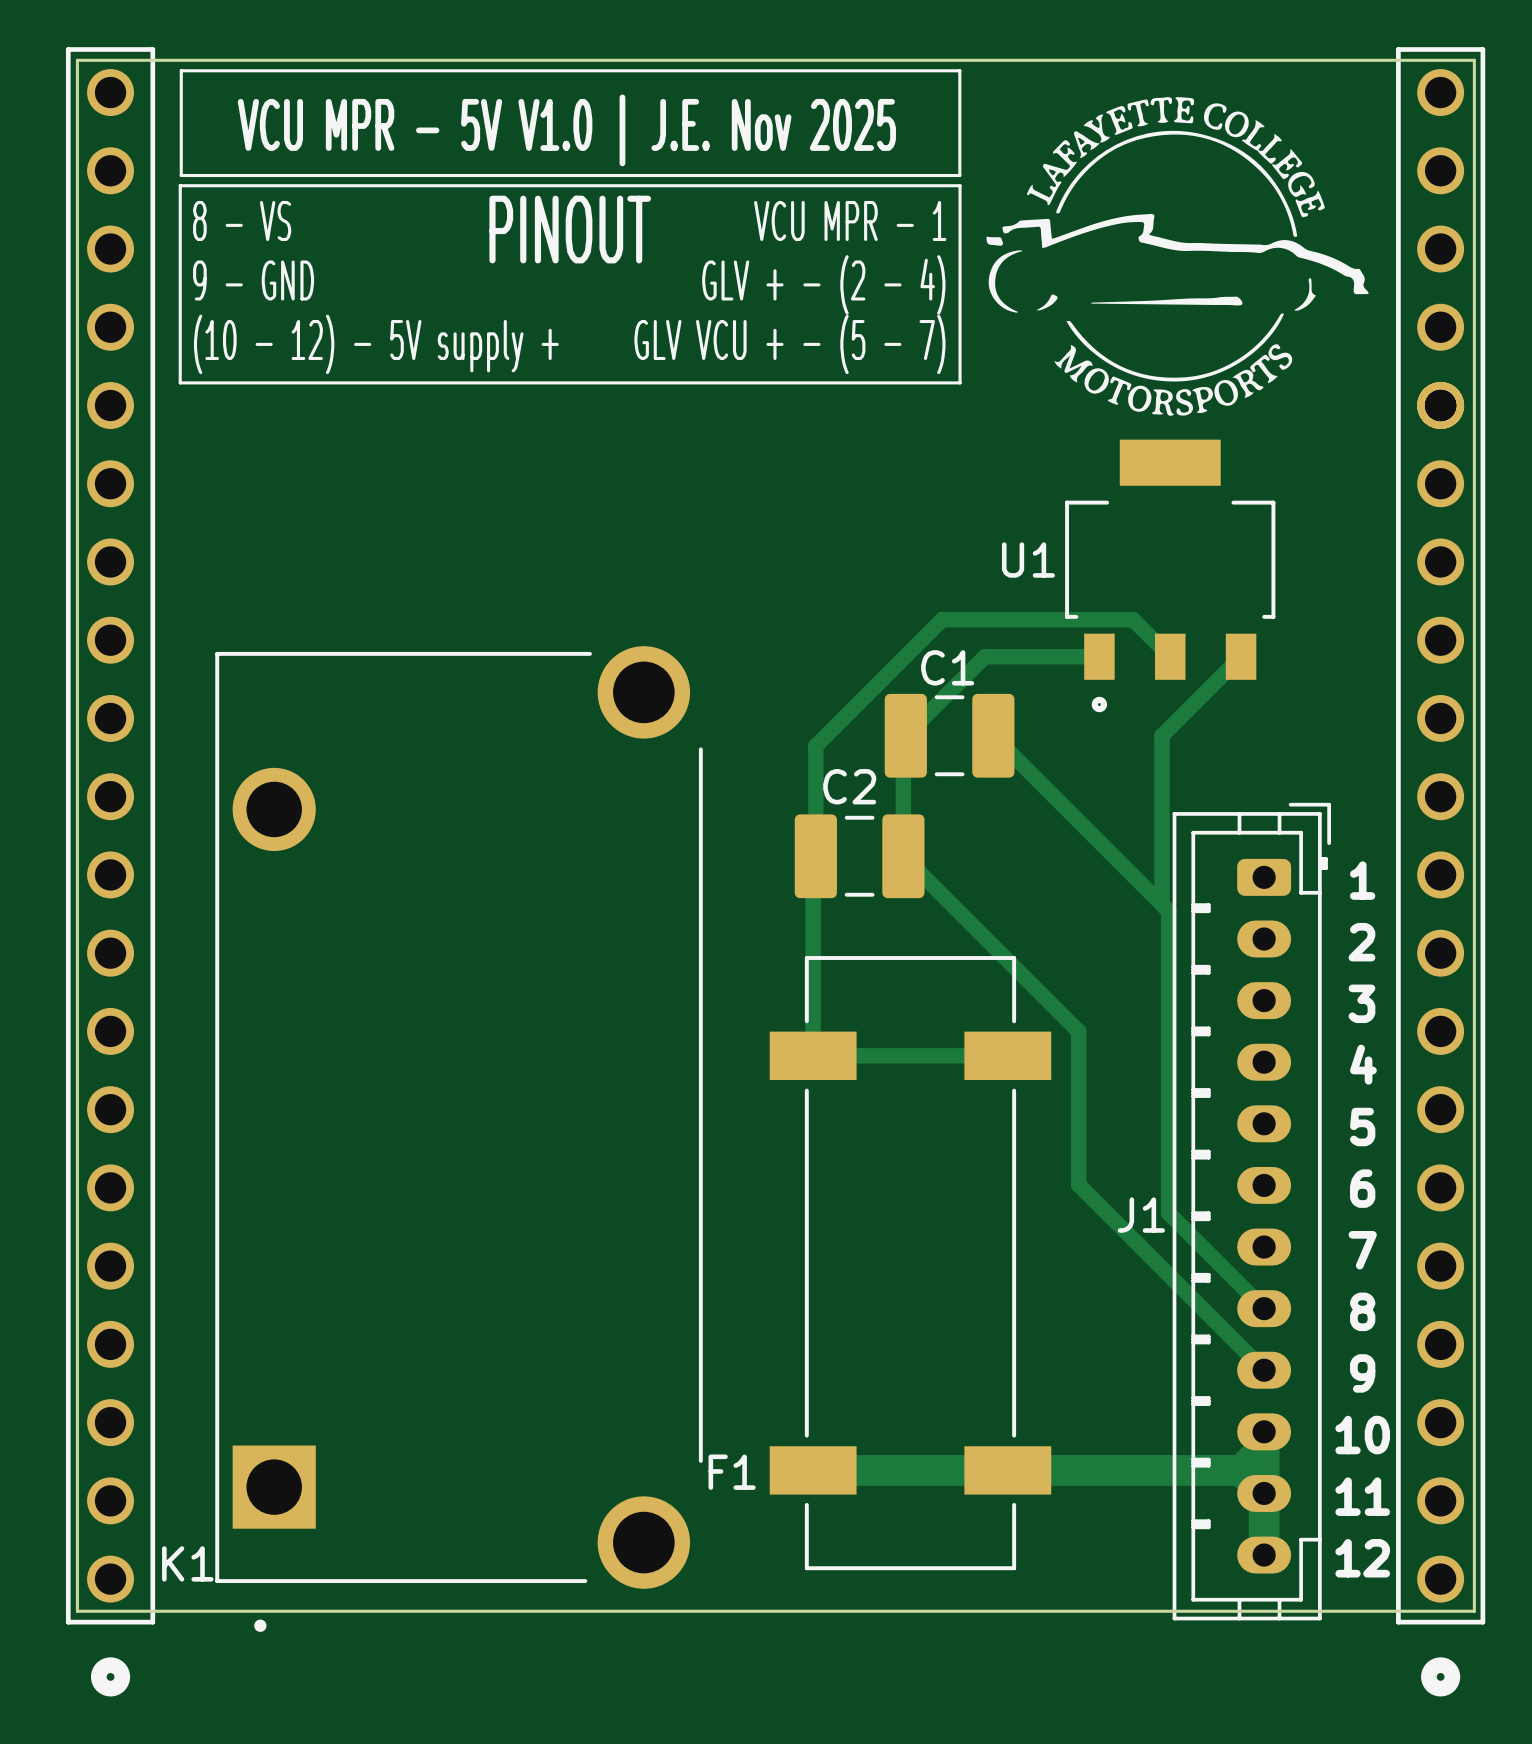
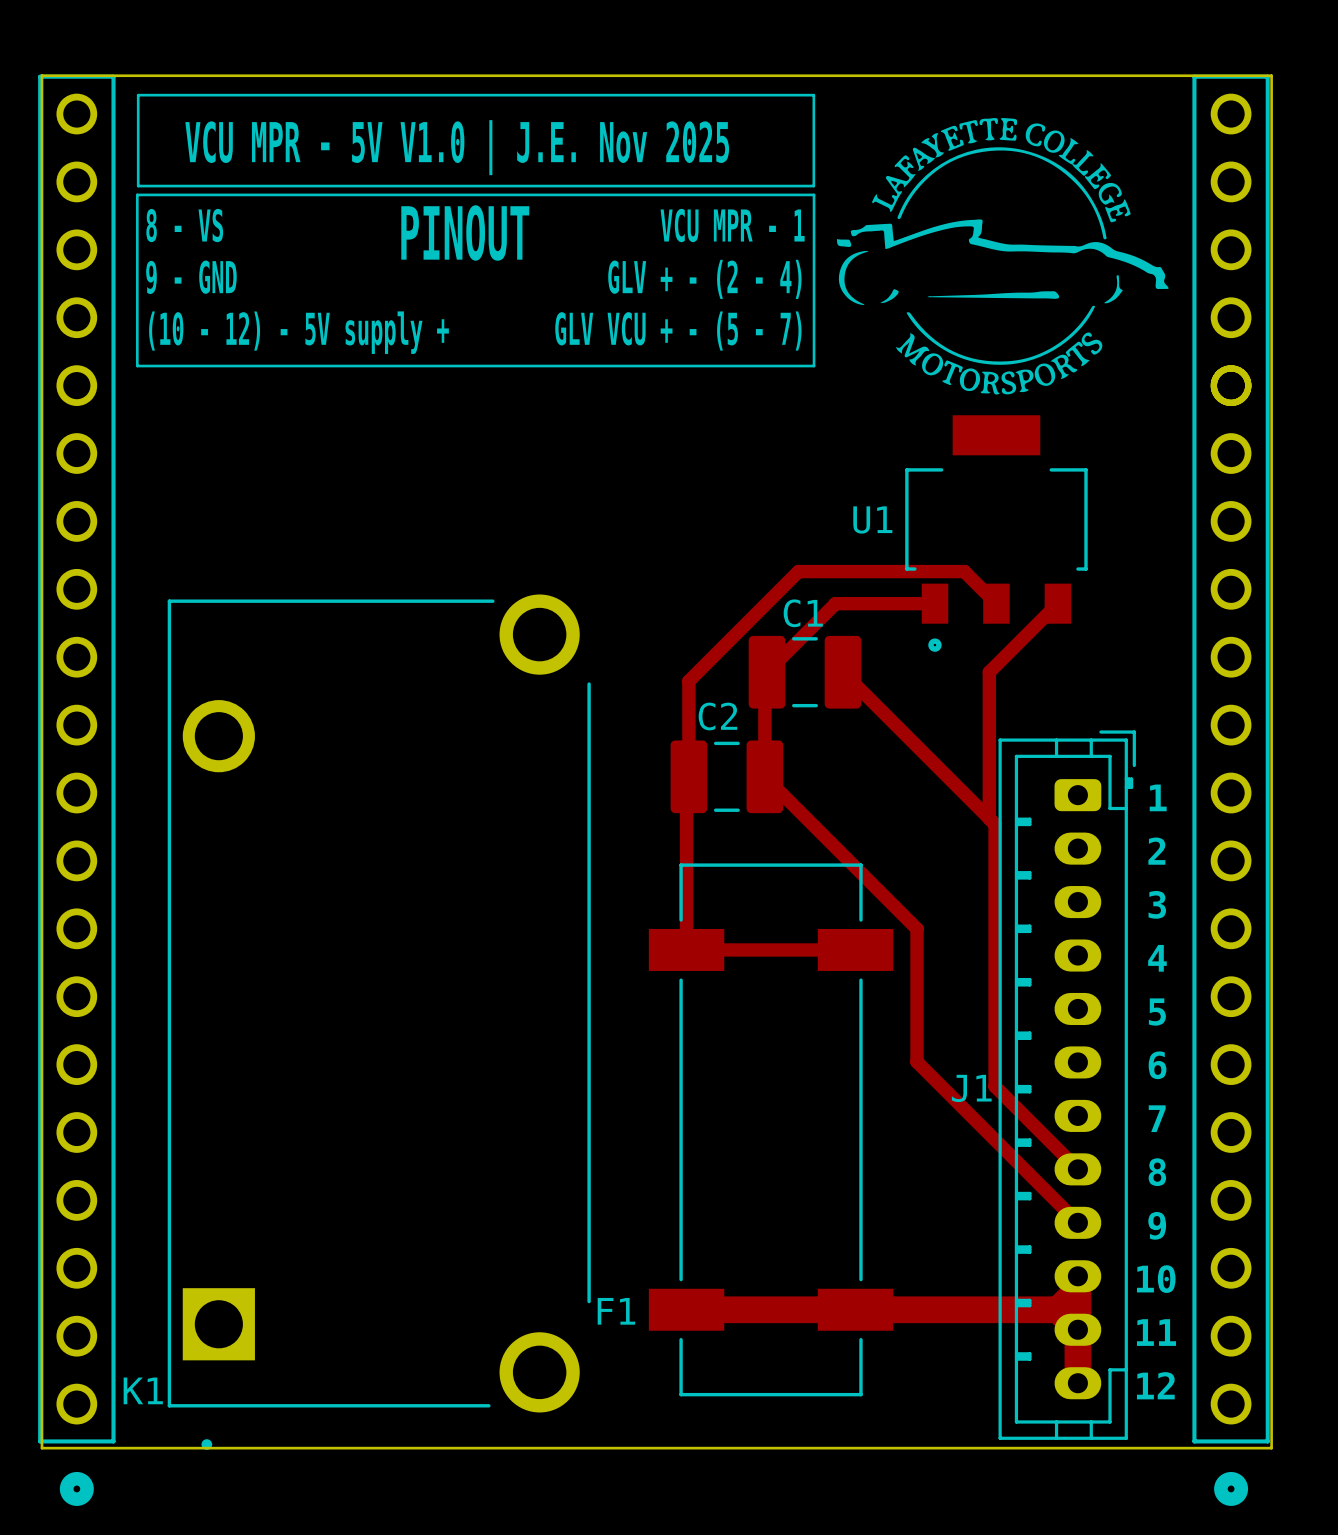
board edge: (77, 60) (1474, 60) (1474, 1611) (77, 1611) (77, 60) -> (41, 75) (41, 1448) (1271, 1448) (1271, 75) (41, 75)

